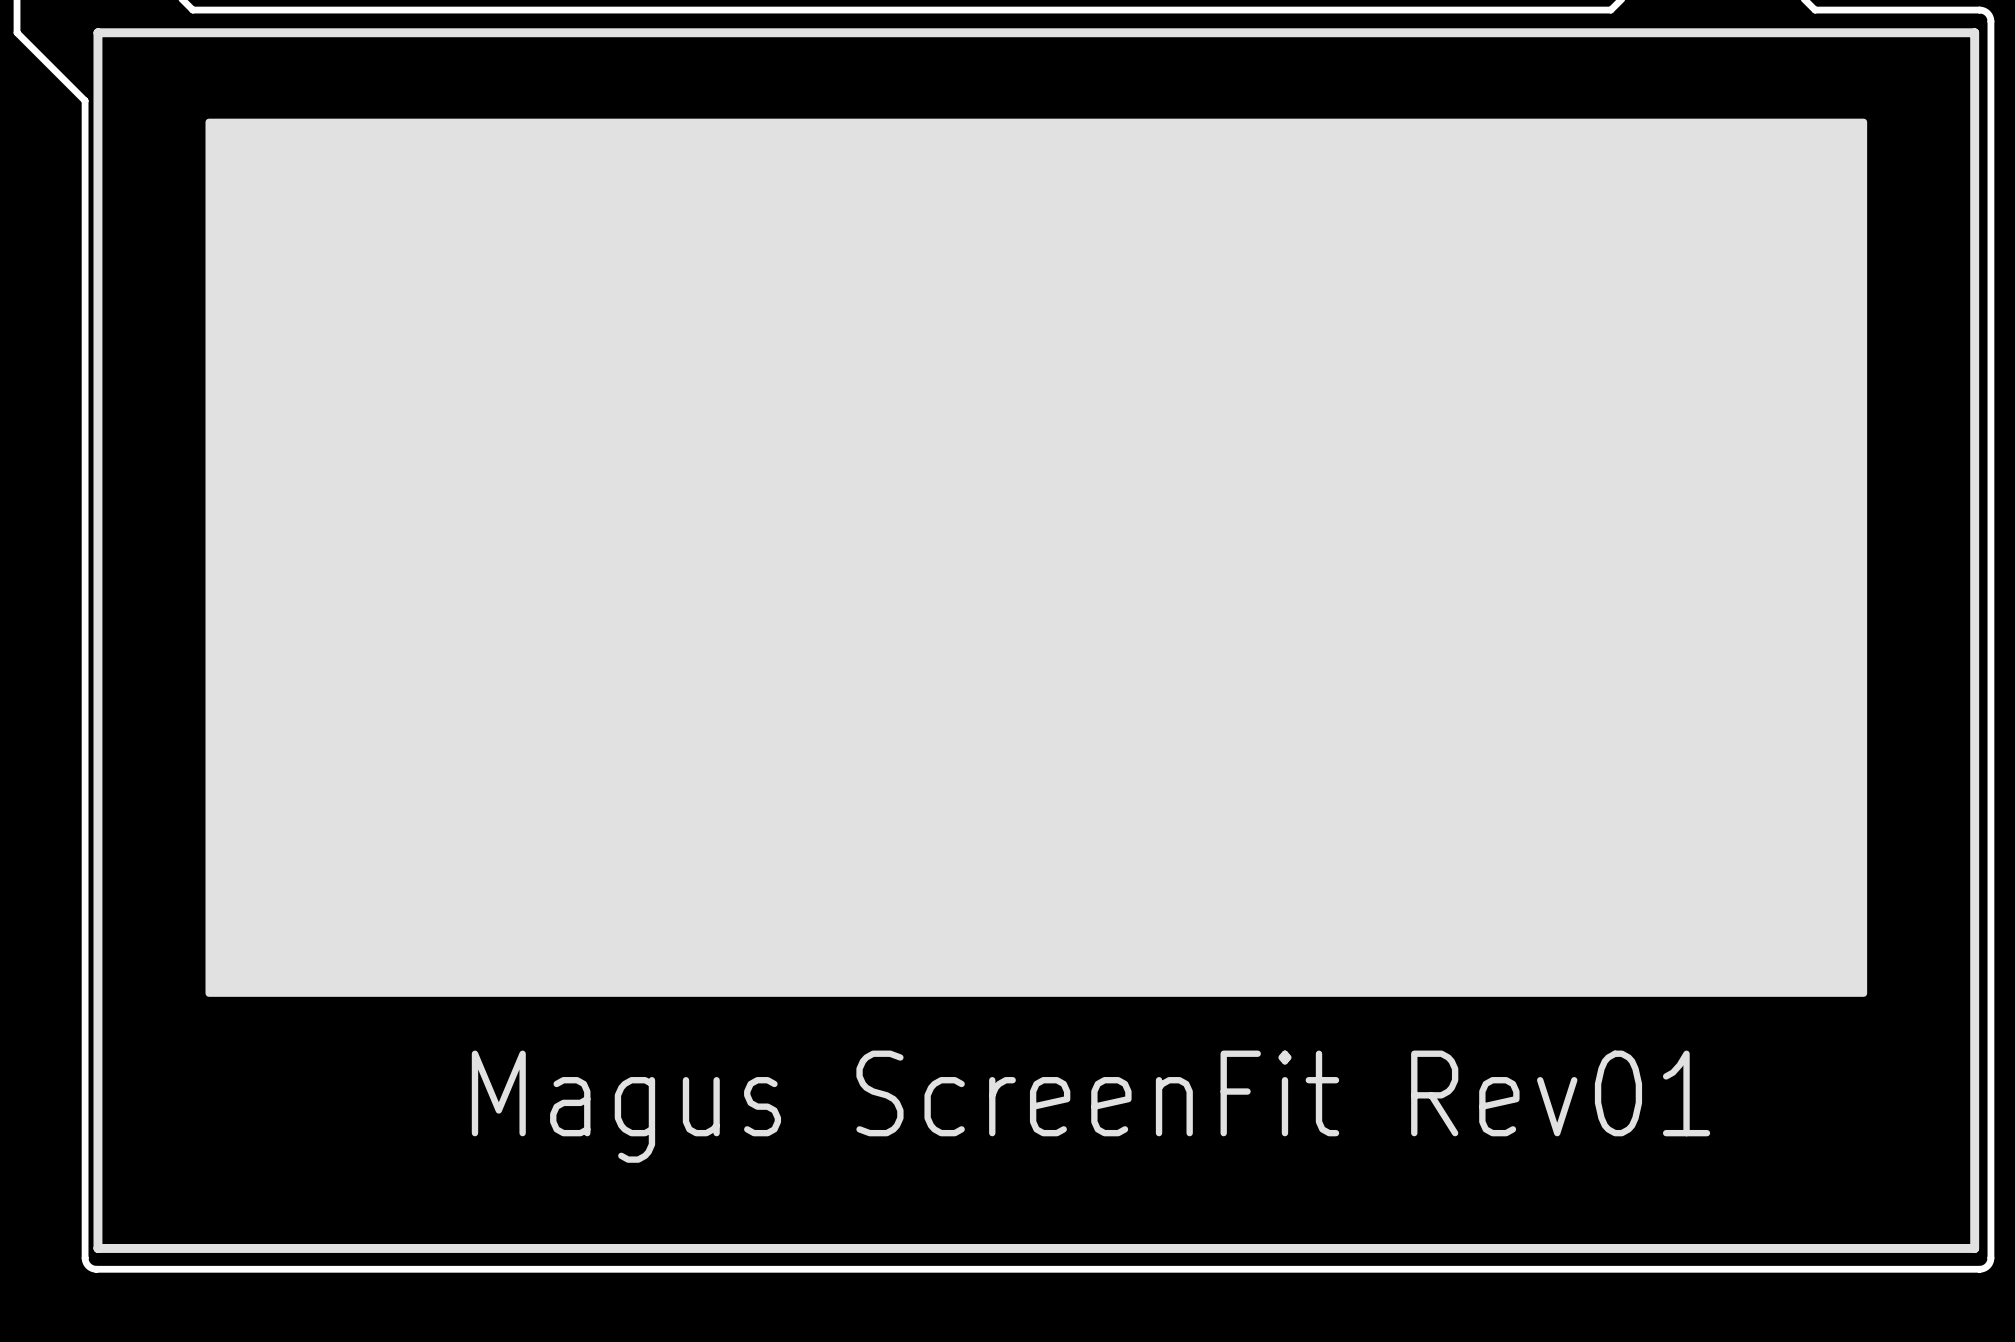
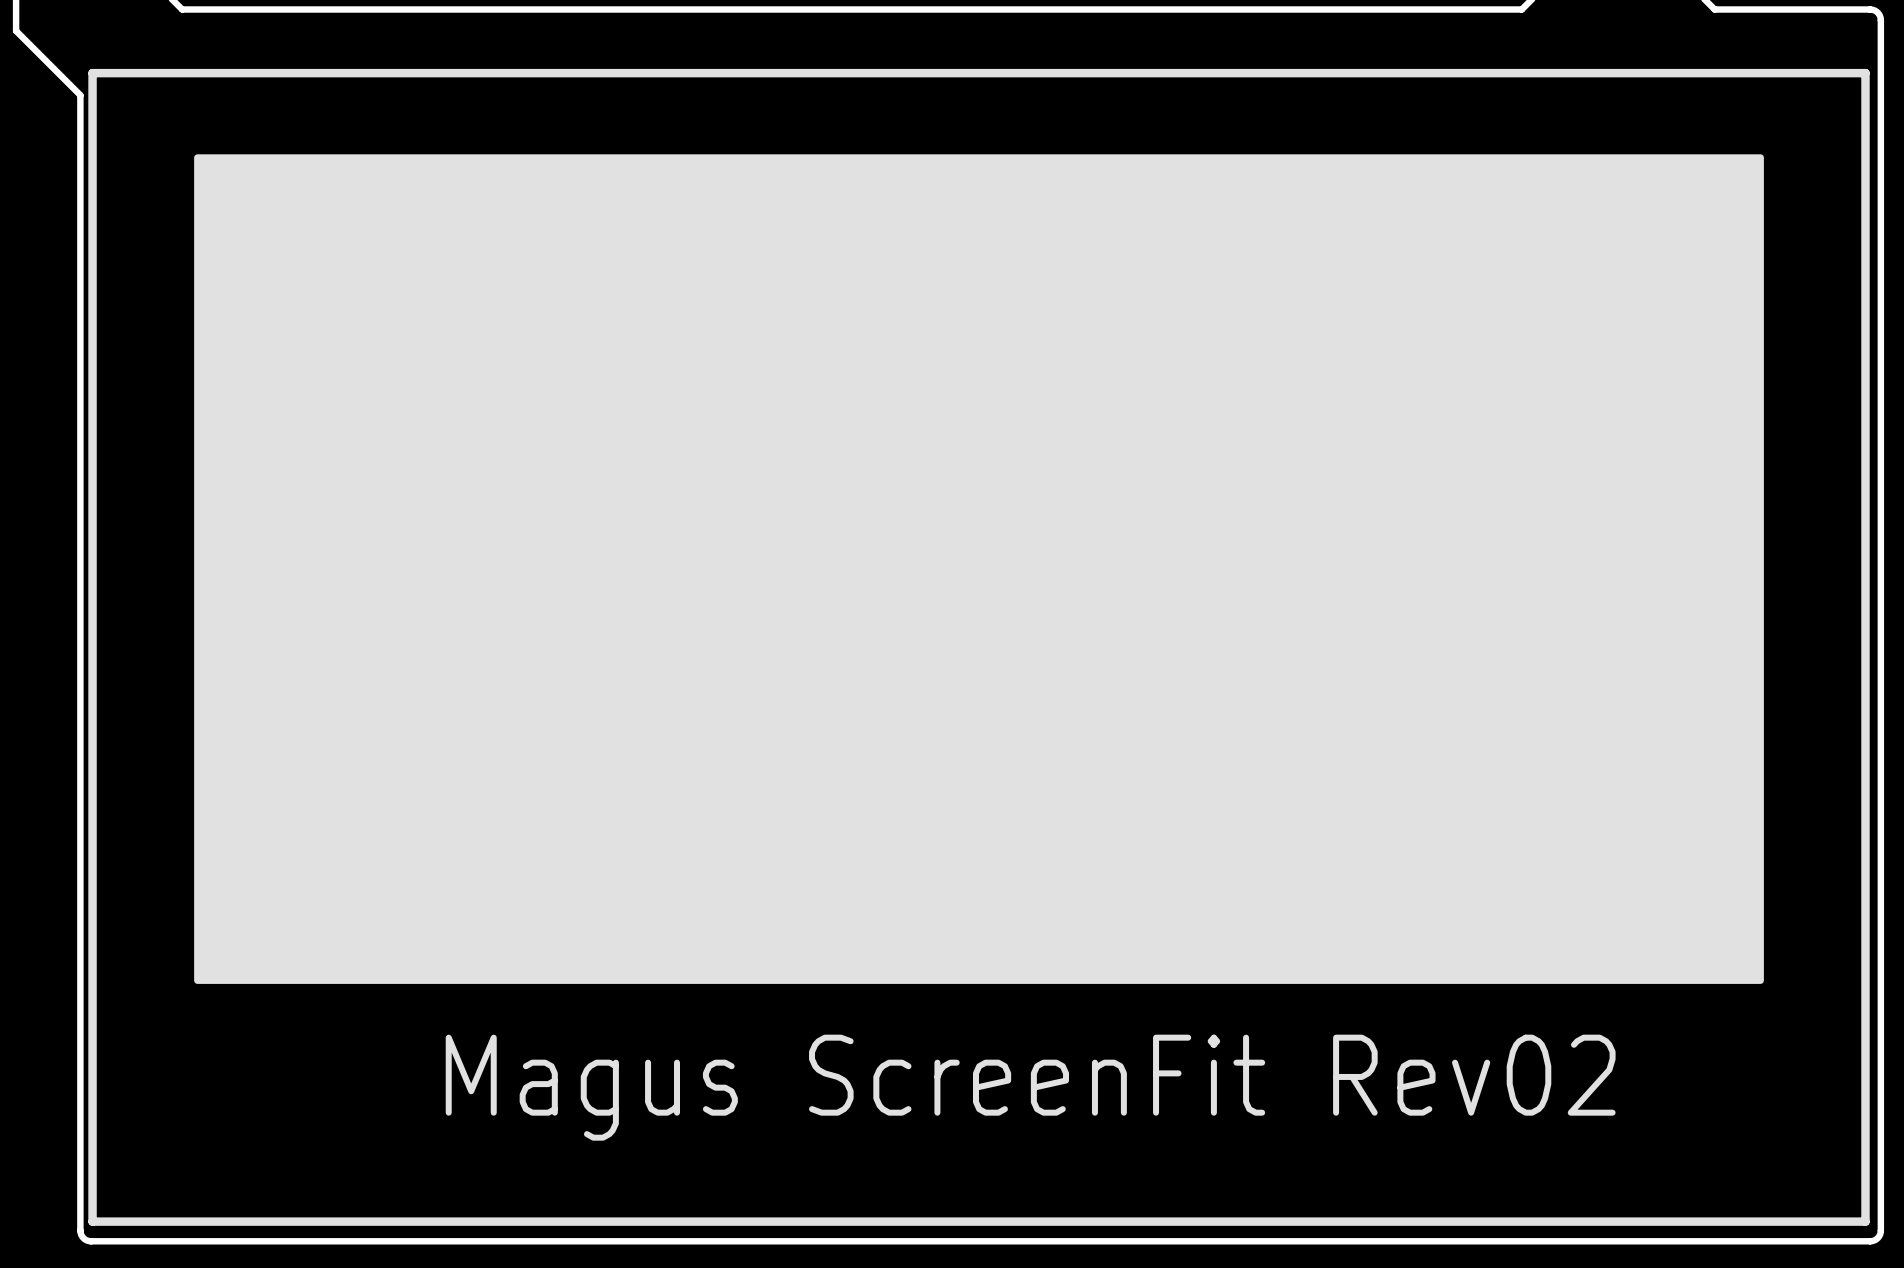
line: (97, 77) (97, 32) (1974, 32) (1974, 77) -> (92, 73) (1865, 73)
drawing position: (1036, 557) -> (979, 569)
text: Magus ScreenFit Rev01 (1090, 1106) -> Magus ScreenFit Rev02 (1030, 1087)
line: (97, 1248) (1974, 1248) -> (92, 1179) (92, 1221) (1865, 1221) (1865, 1179)
board edge: (85, 1257) (88, 1265) (96, 1269) (1979, 1269) (1987, 1265) (1990, 1257) -> (80, 1188) (80, 1233) (84, 1239) (91, 1241) (1870, 1241) (1876, 1239) (1880, 1233) (1880, 1188)

